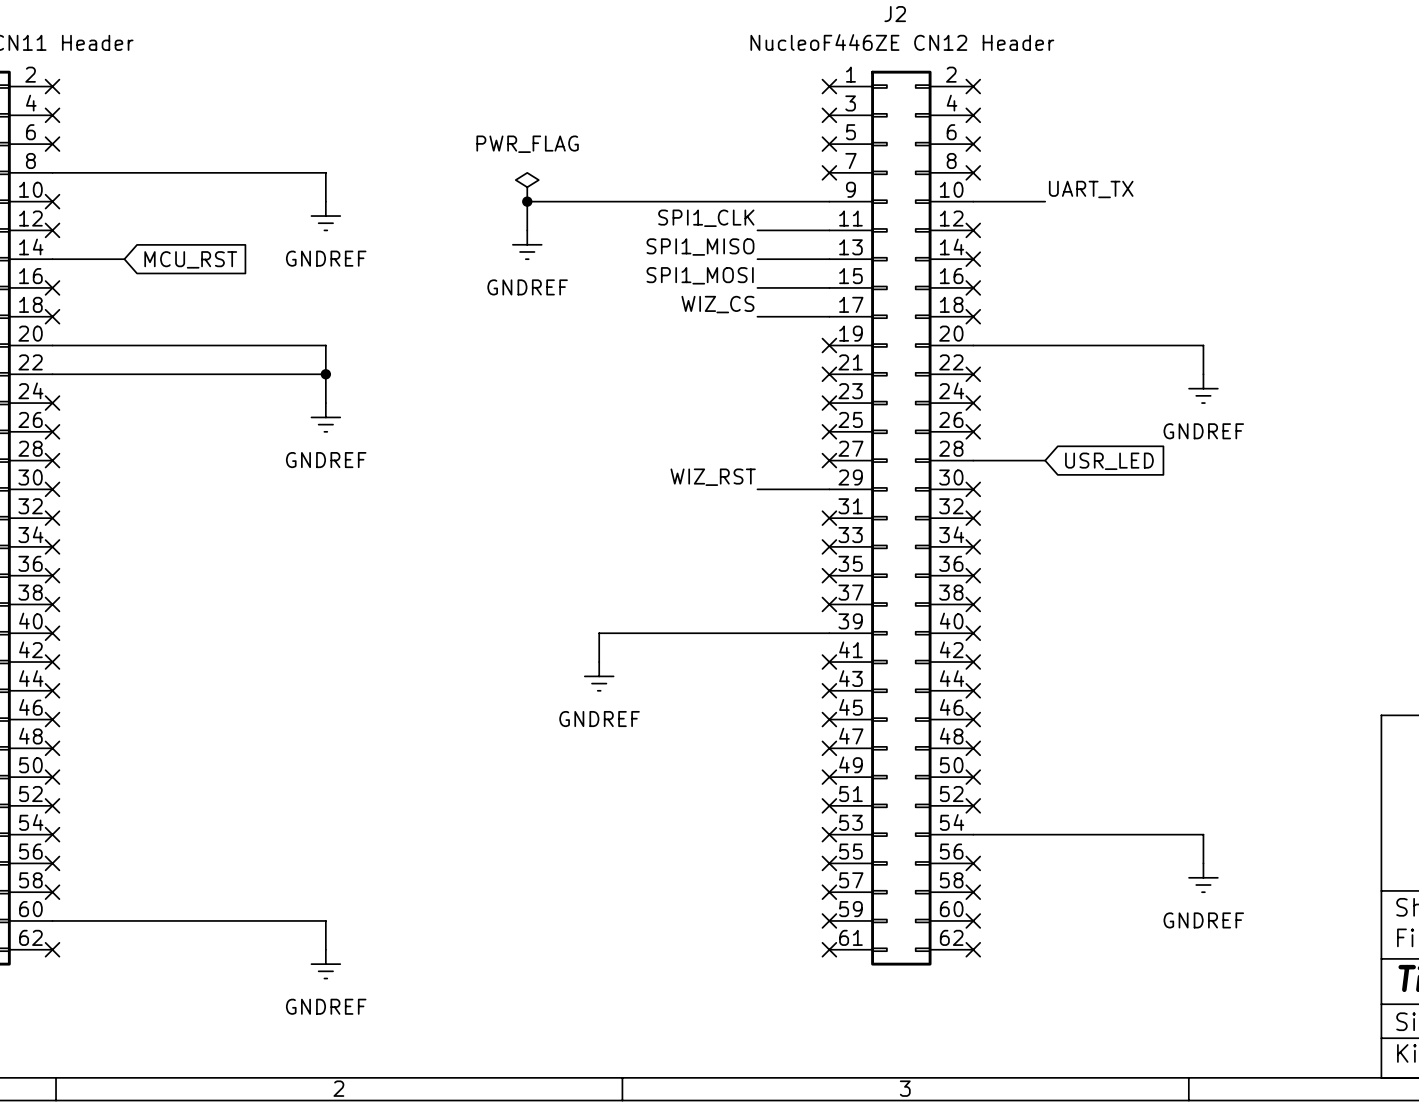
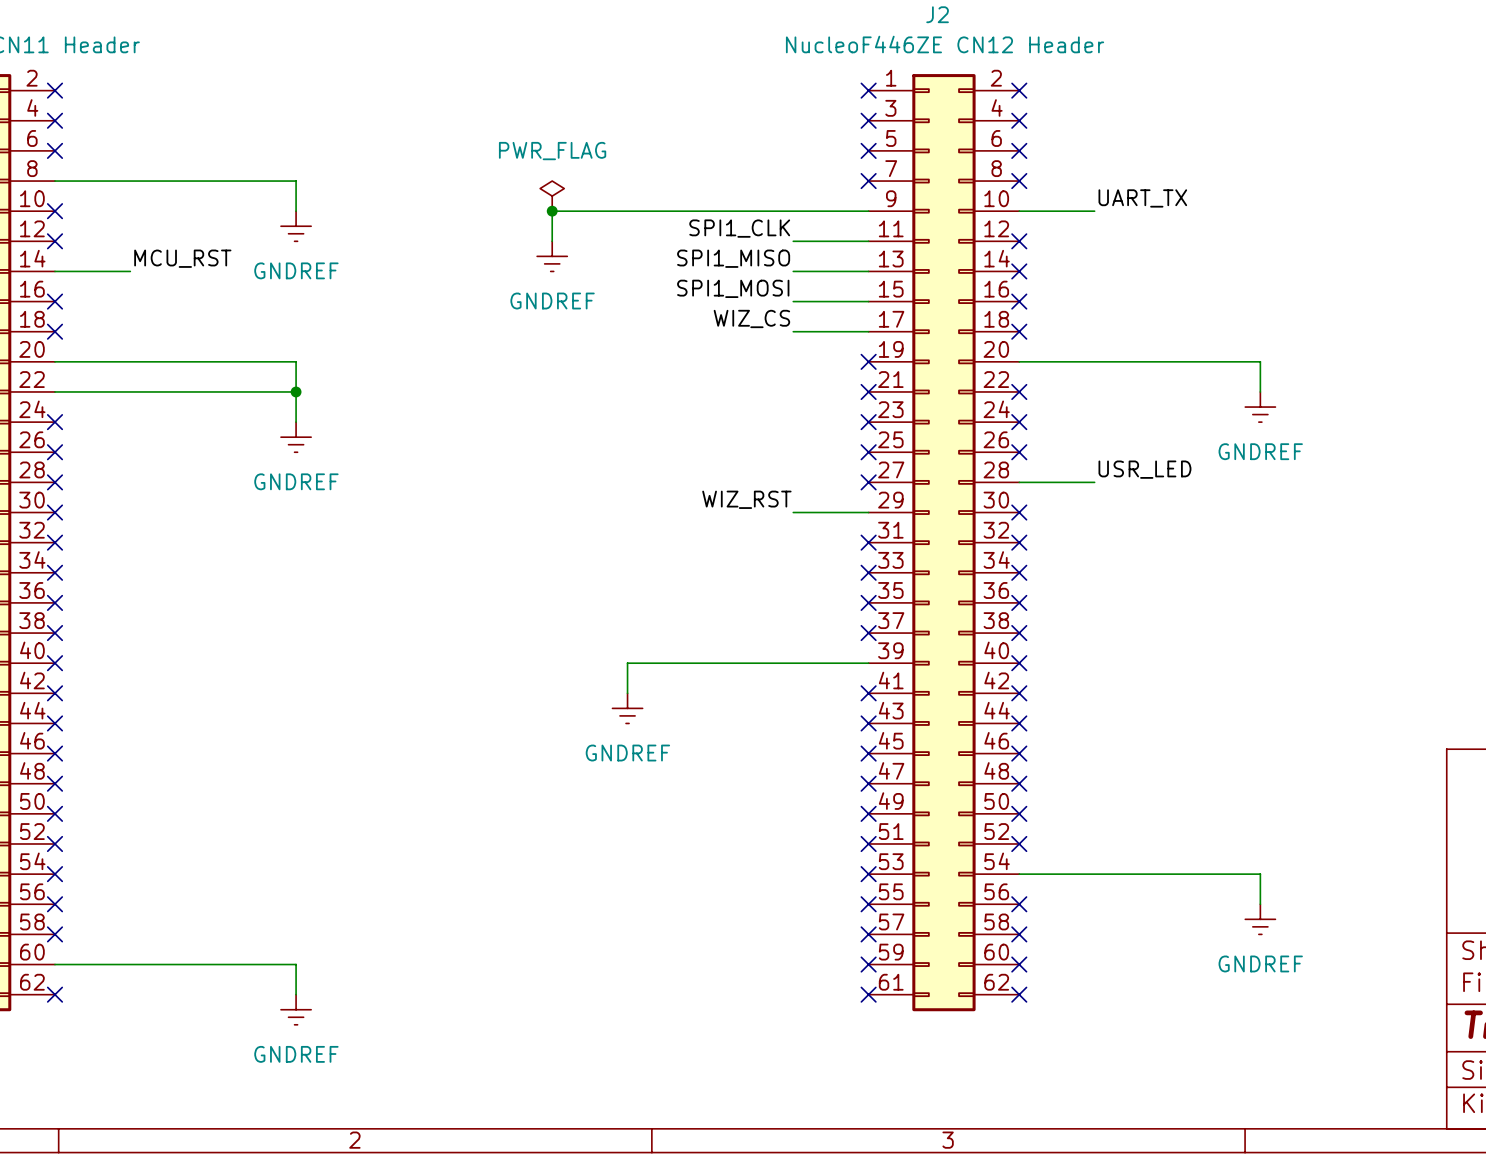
wire: (282, 172) (325, 172) (325, 201) -> (296, 181) (296, 211)
power symbol position: GNDREF (325, 216) -> GNDREF (296, 226)
label: none -> MCU_RST (182, 258)
global label: MCU_RST (190, 259) -> none
wire: (282, 345) (325, 345) (325, 403) -> (296, 361) (296, 422)
wire: (282, 374) (325, 374) -> none
junction position: (325, 374) -> (296, 391)
power symbol position: GNDREF (325, 417) -> GNDREF (296, 437)
label: none -> USR_LED (1144, 469)
global label: USR_LED (1109, 461) -> none
wire: (282, 920) (325, 920) (325, 949) -> (296, 964) (296, 994)
power symbol position: GNDREF (325, 964) -> GNDREF (296, 1009)

